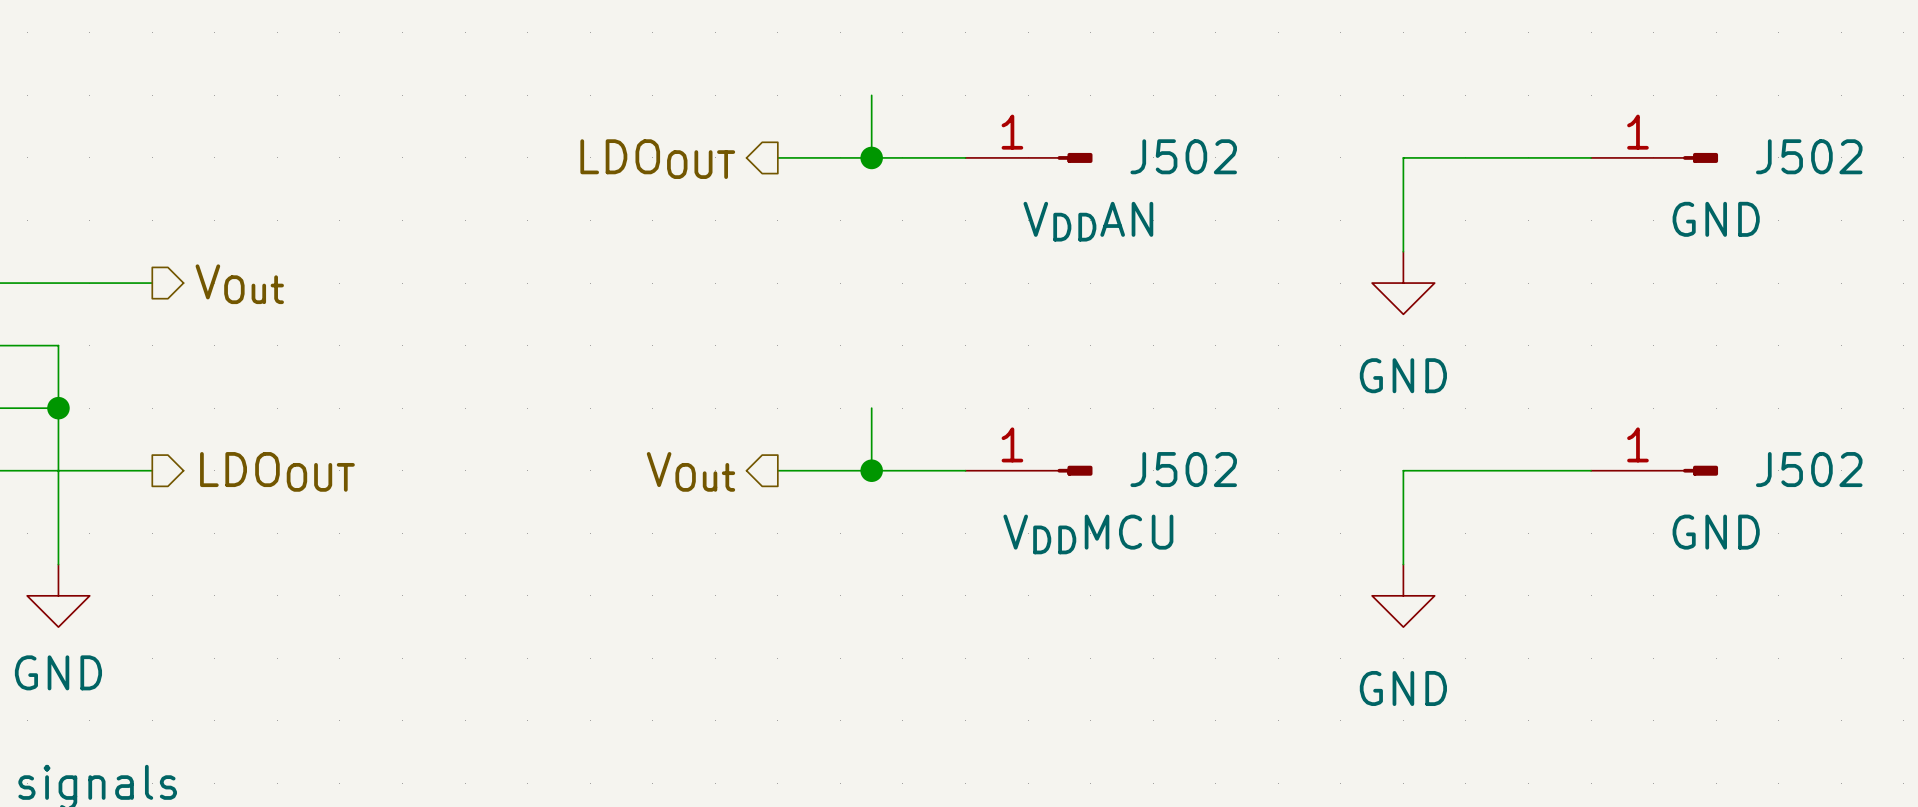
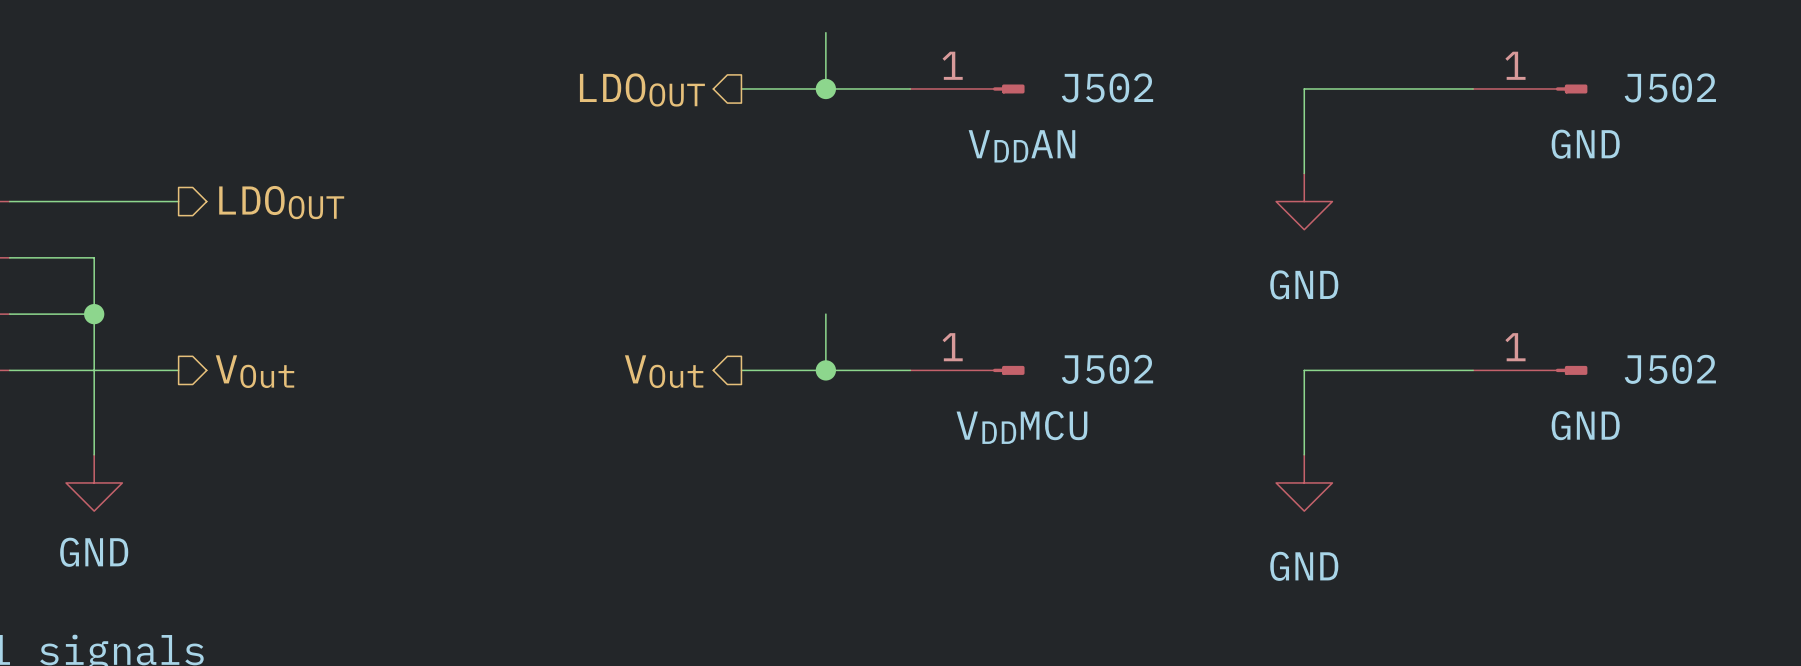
hierarchical label: VOut (239, 284) -> LDOOUT (281, 202)
hierarchical label: LDOOUT (277, 471) -> VOut (255, 371)

